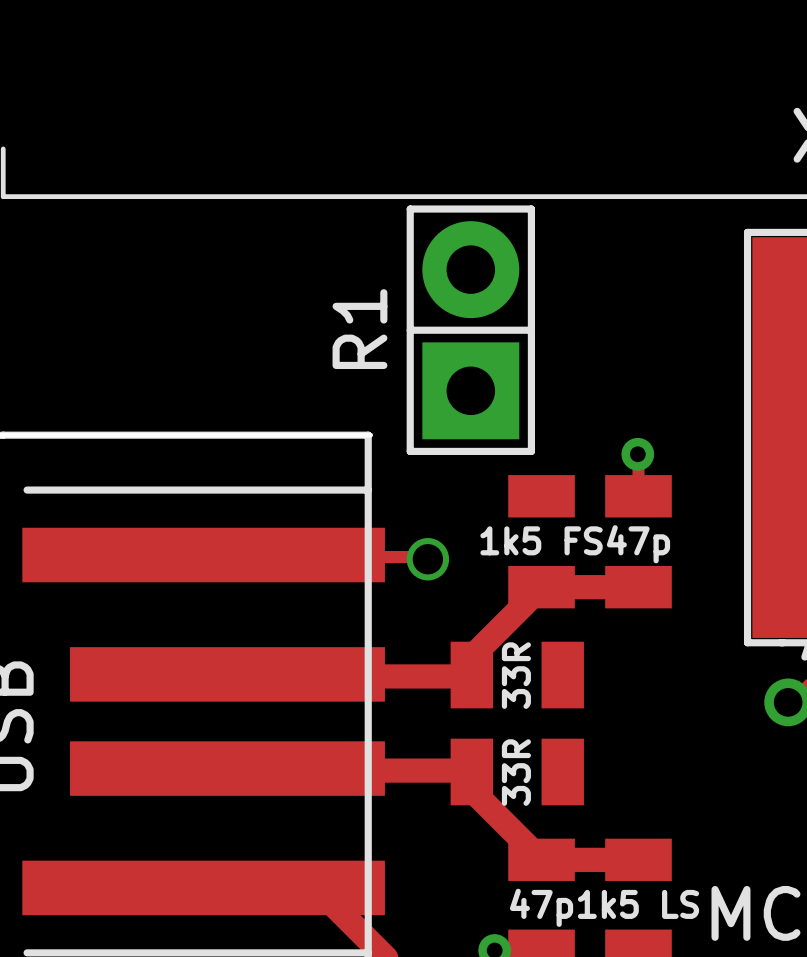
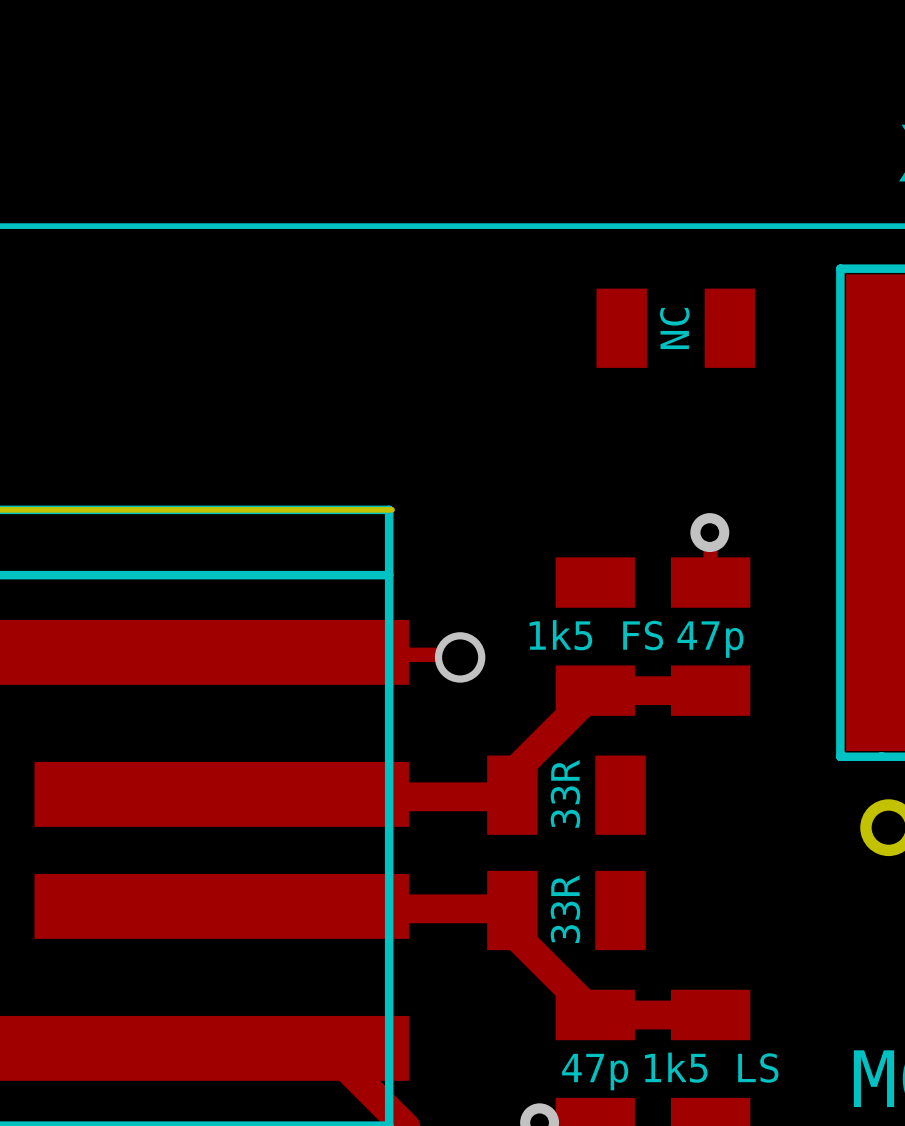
part: none -> NC (675, 328)
R1: (470, 330) -> none

